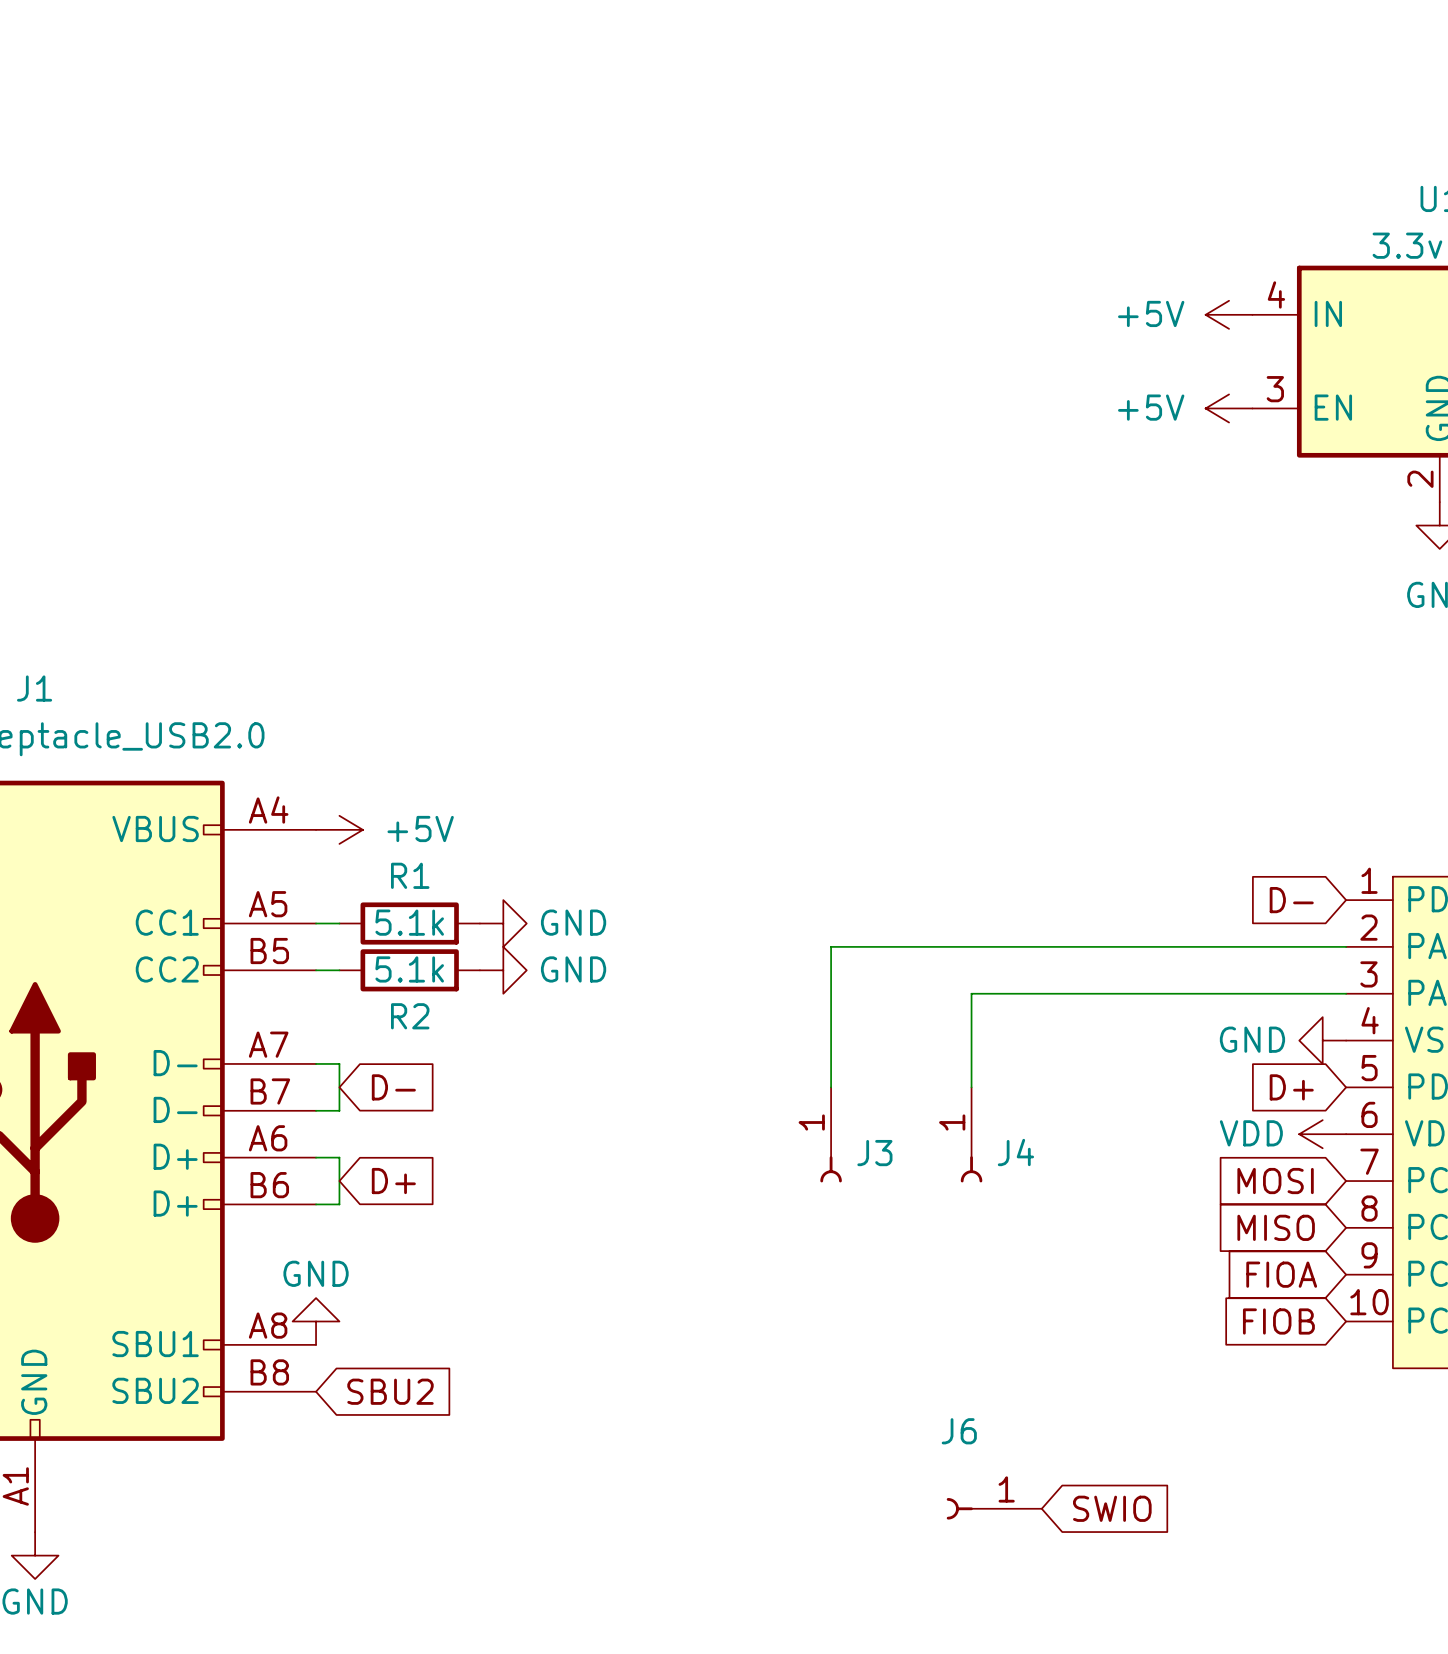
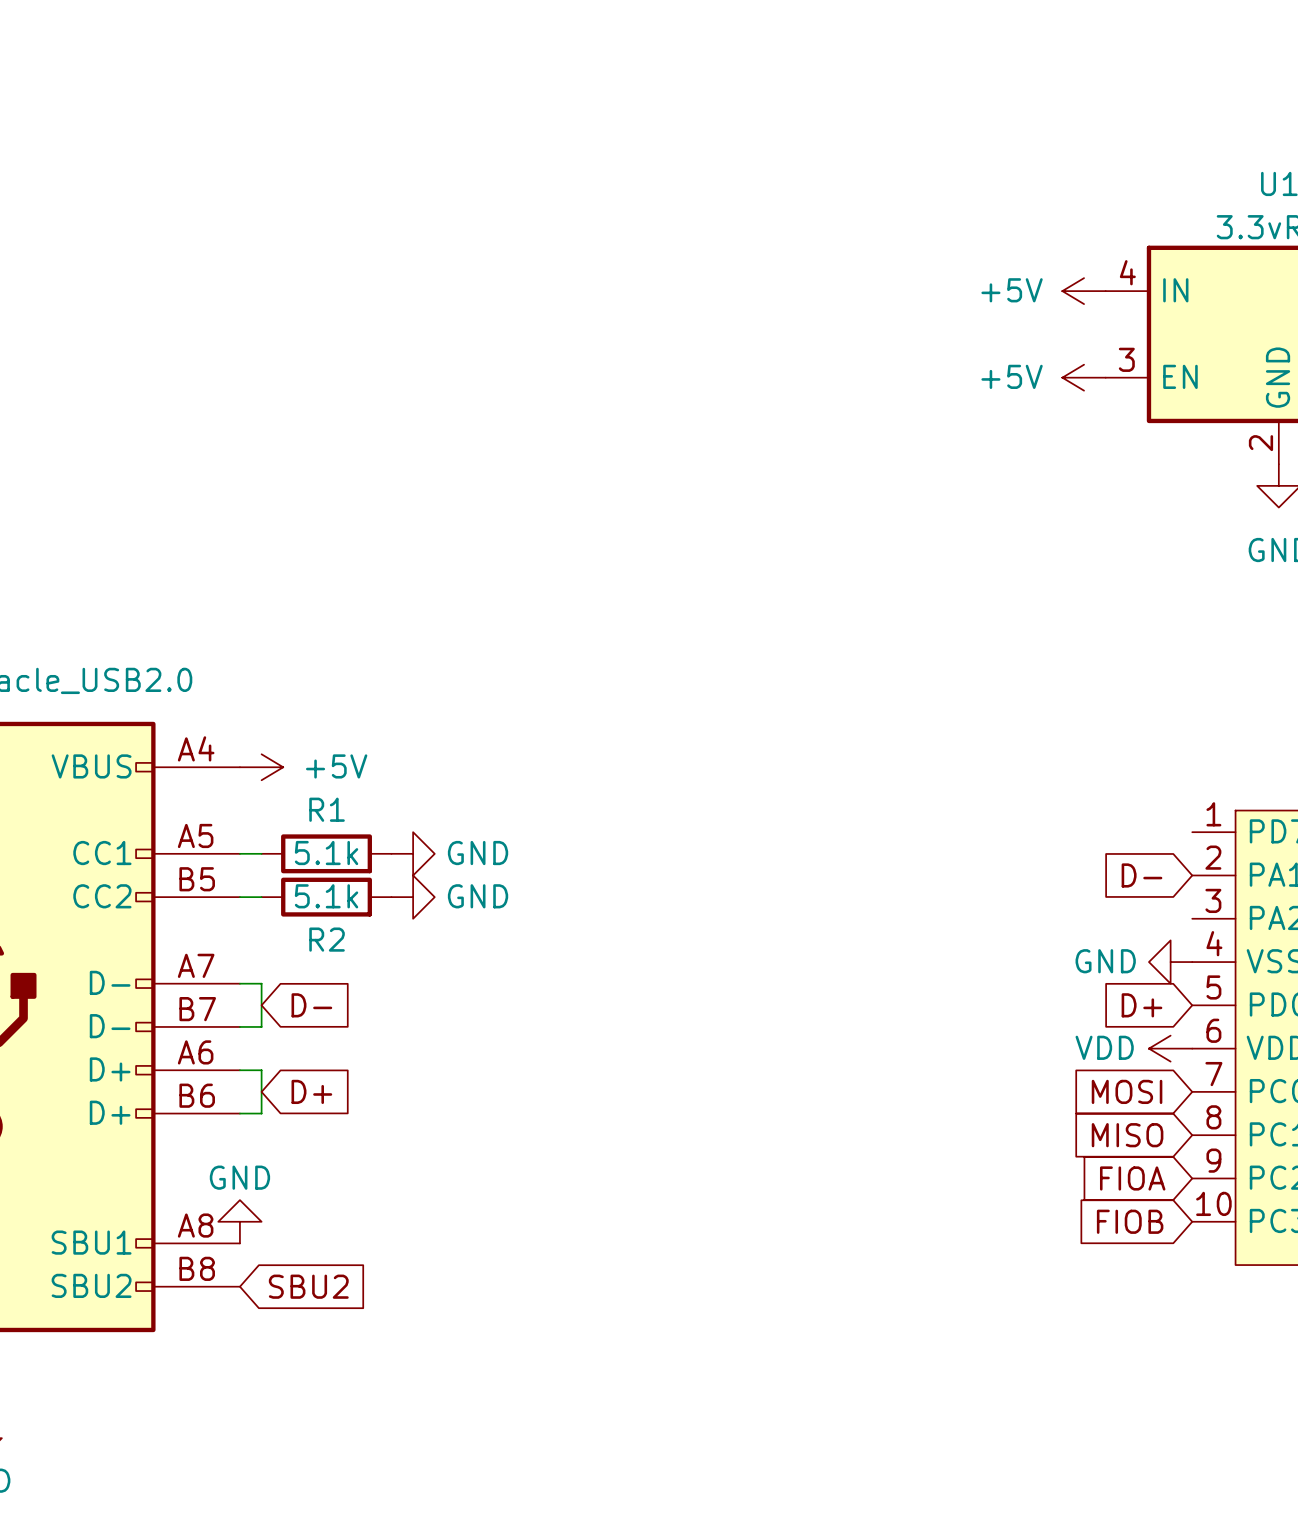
global label position: D- (1291, 900) -> D- (1141, 875)
wire: (1346, 946) (831, 946) (831, 1087) -> none
wire: (1346, 993) (971, 993) (971, 1087) -> none
J3: (831, 1134) -> none
J4: (971, 1134) -> none
J6: (994, 1508) -> none
global label: SWIO (1112, 1508) -> none

